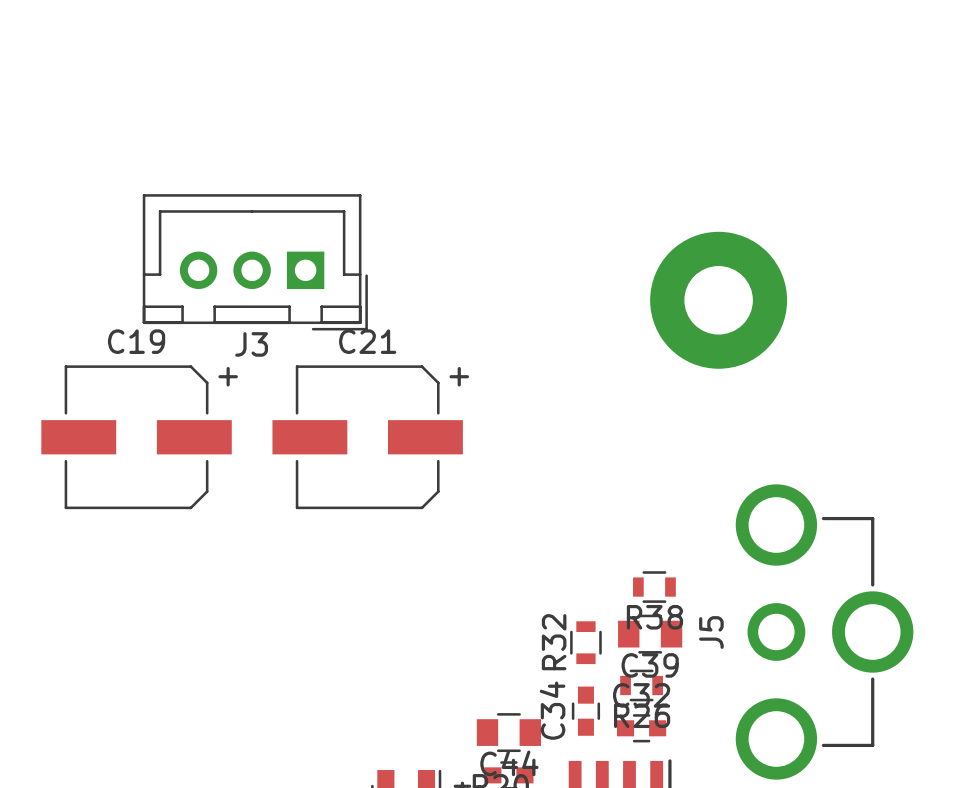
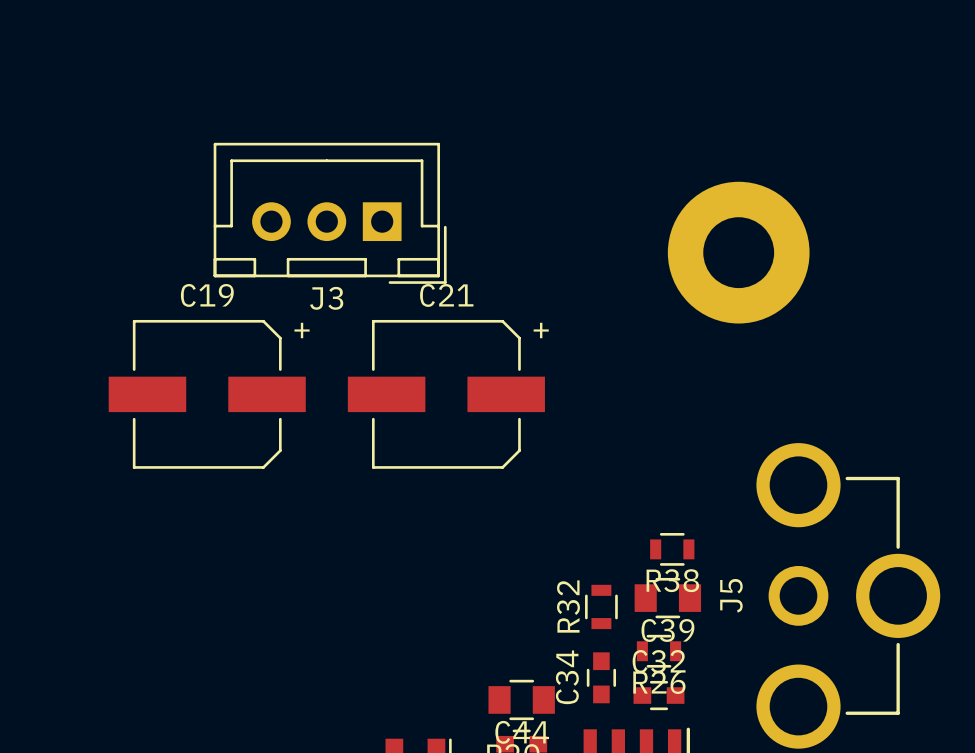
J3 position: (255, 262) -> (330, 213)
C19 position: (136, 437) -> (207, 394)
C21 position: (367, 437) -> (446, 394)

